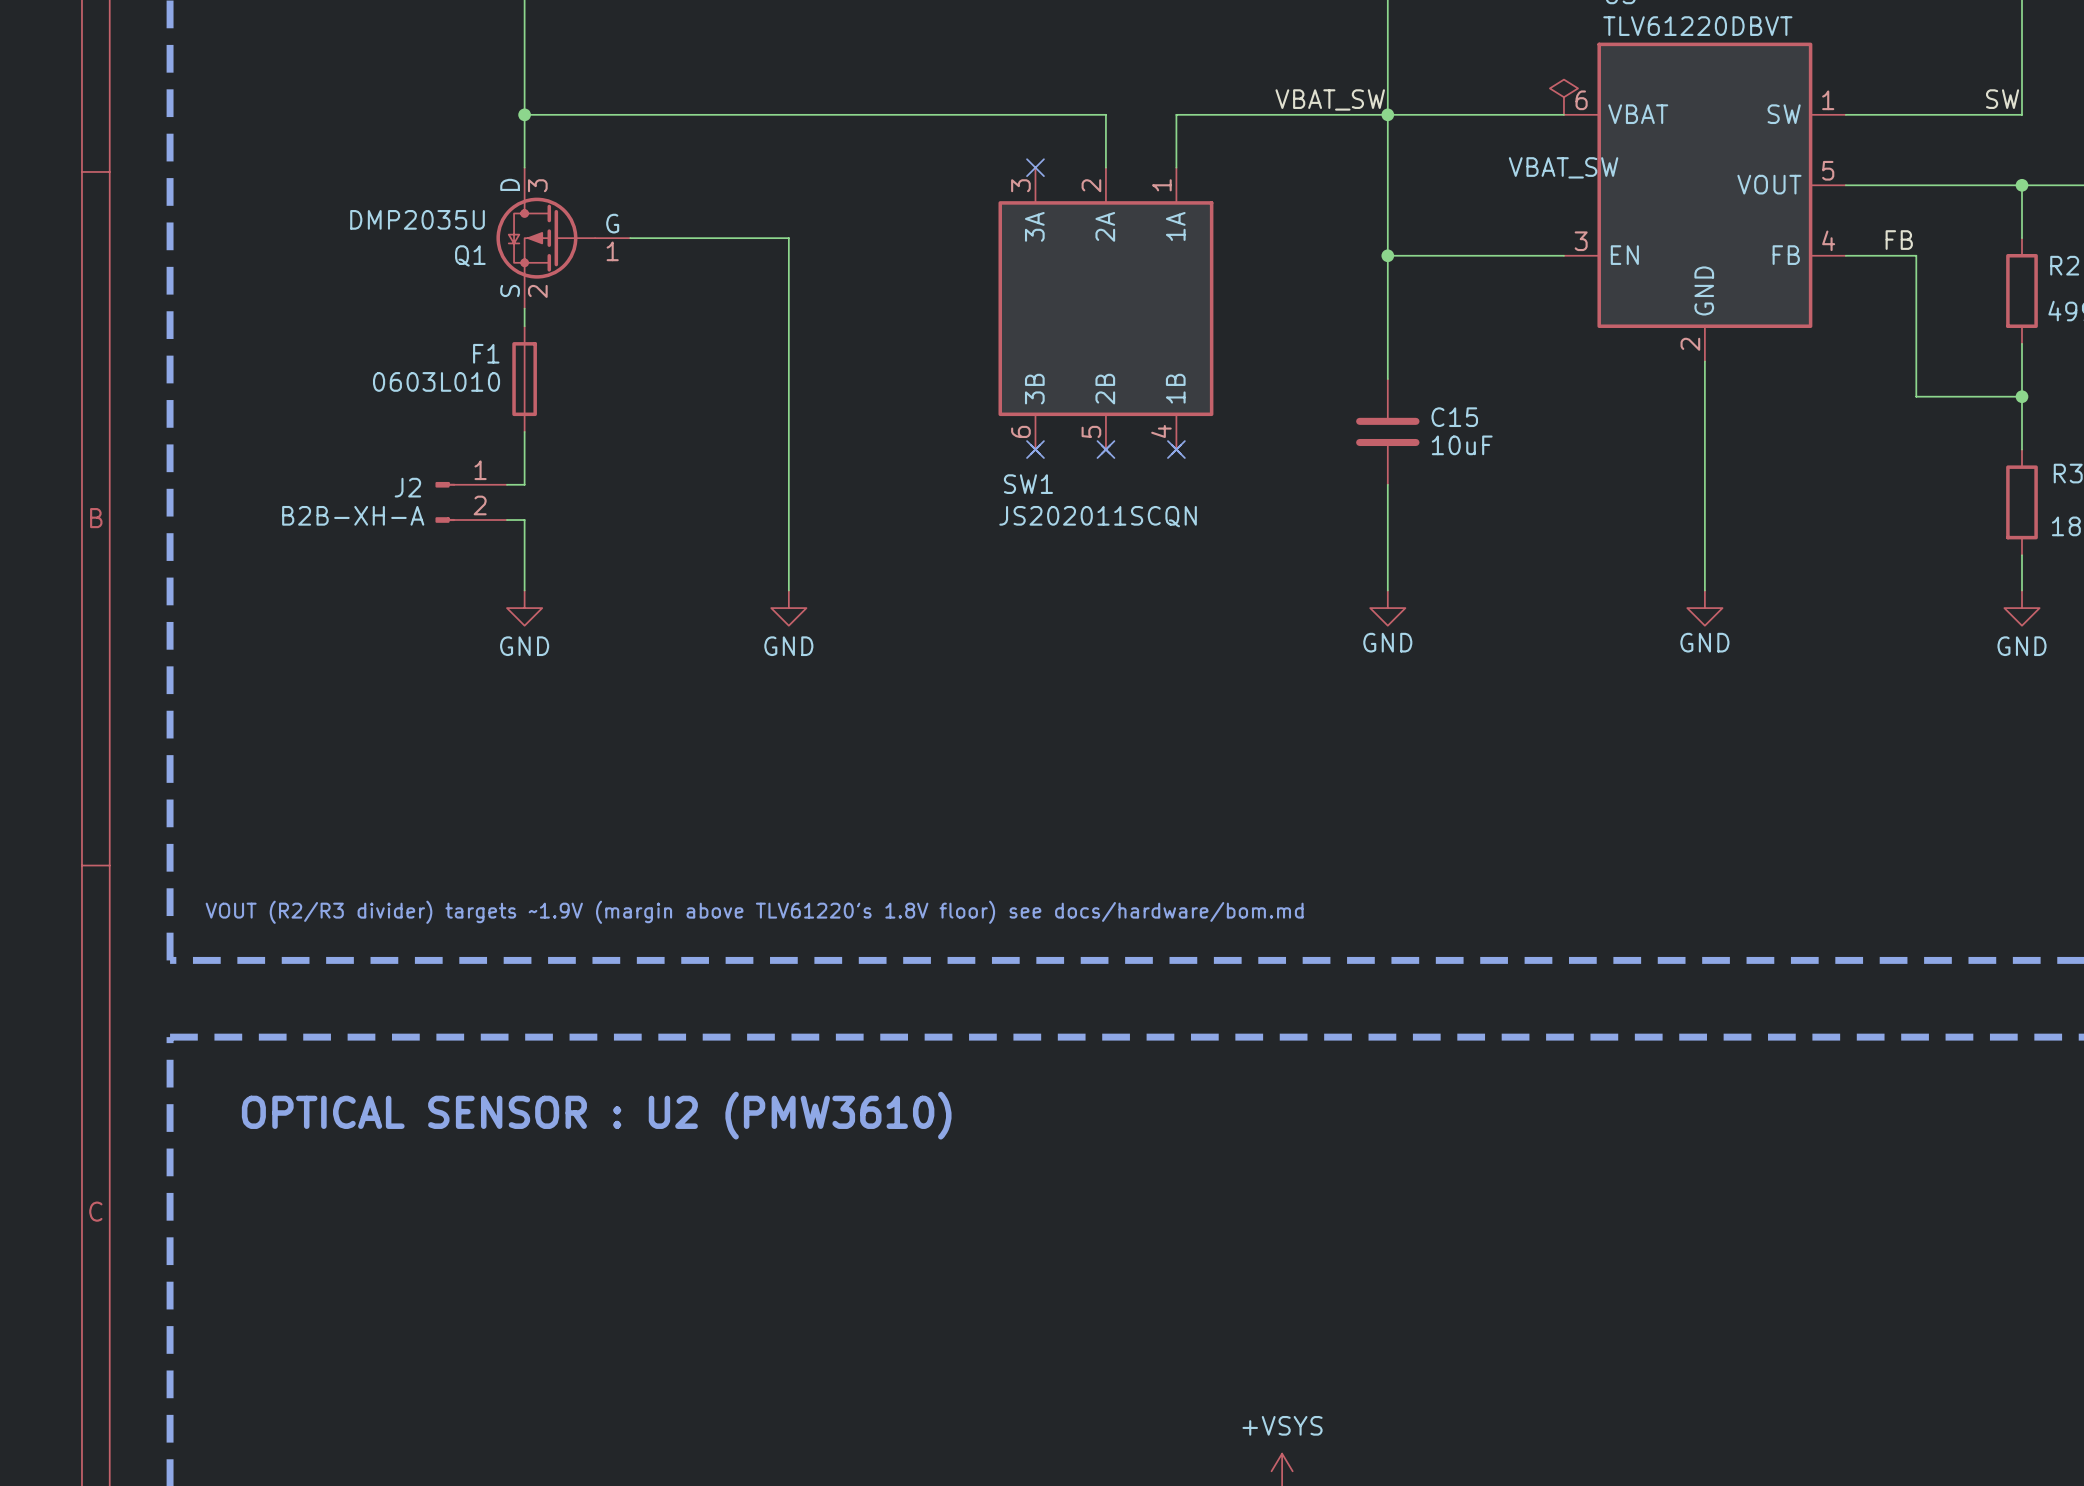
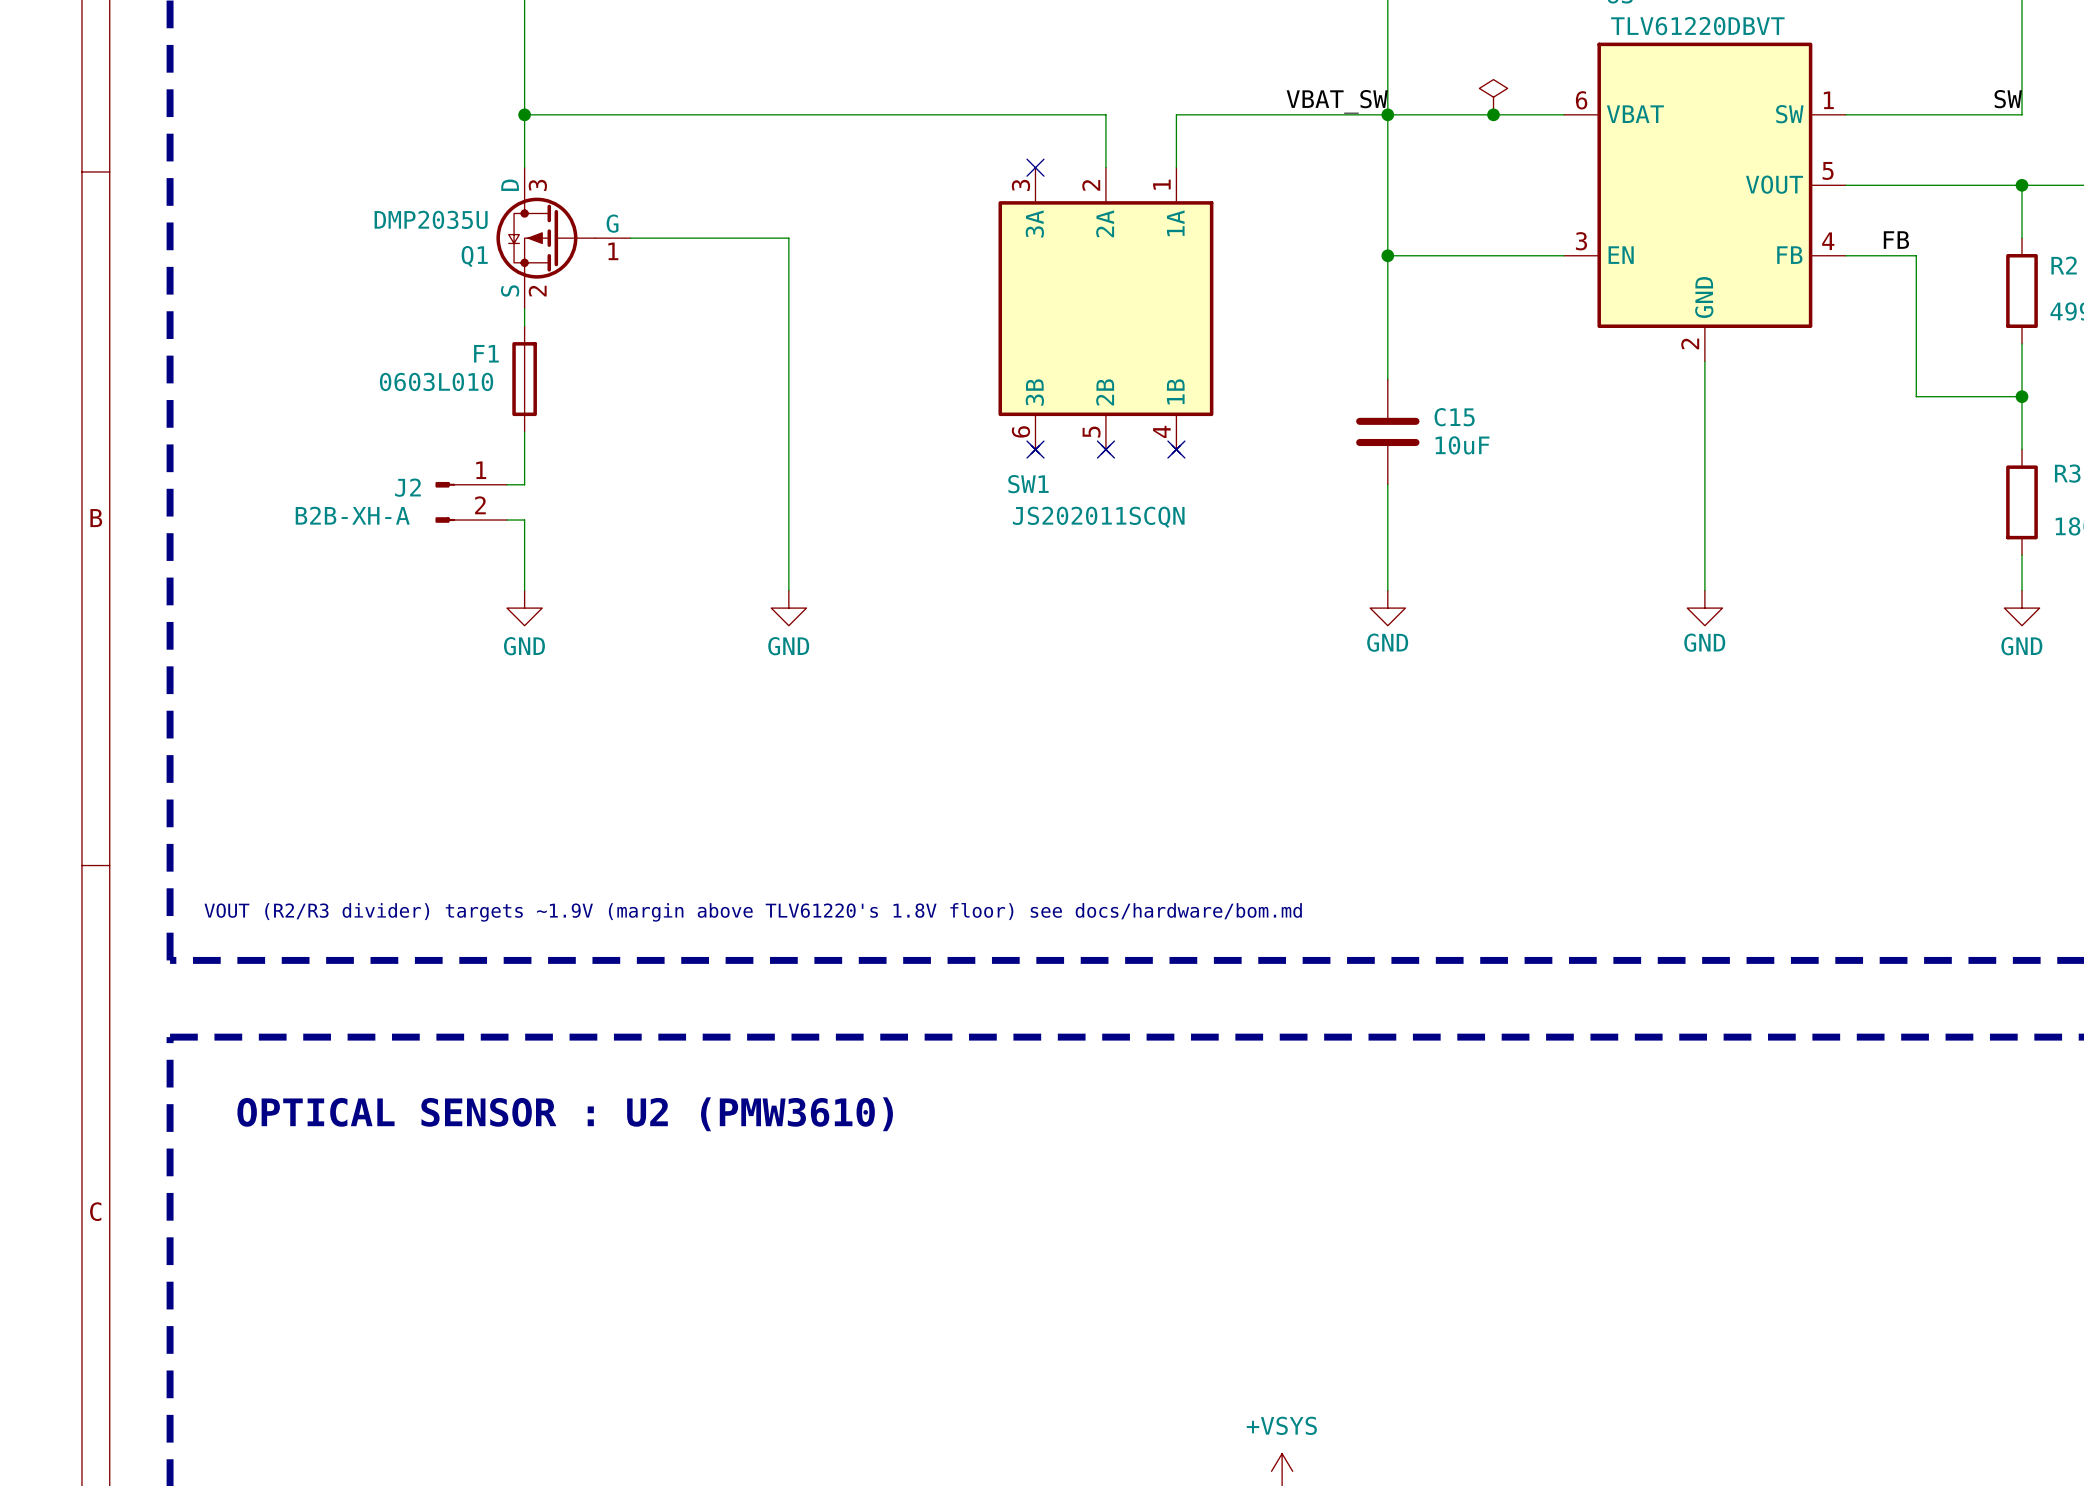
power symbol: none -> (1493, 97)
power symbol: VBAT_SW (1563, 97) -> none
junction: none -> (1493, 114)

